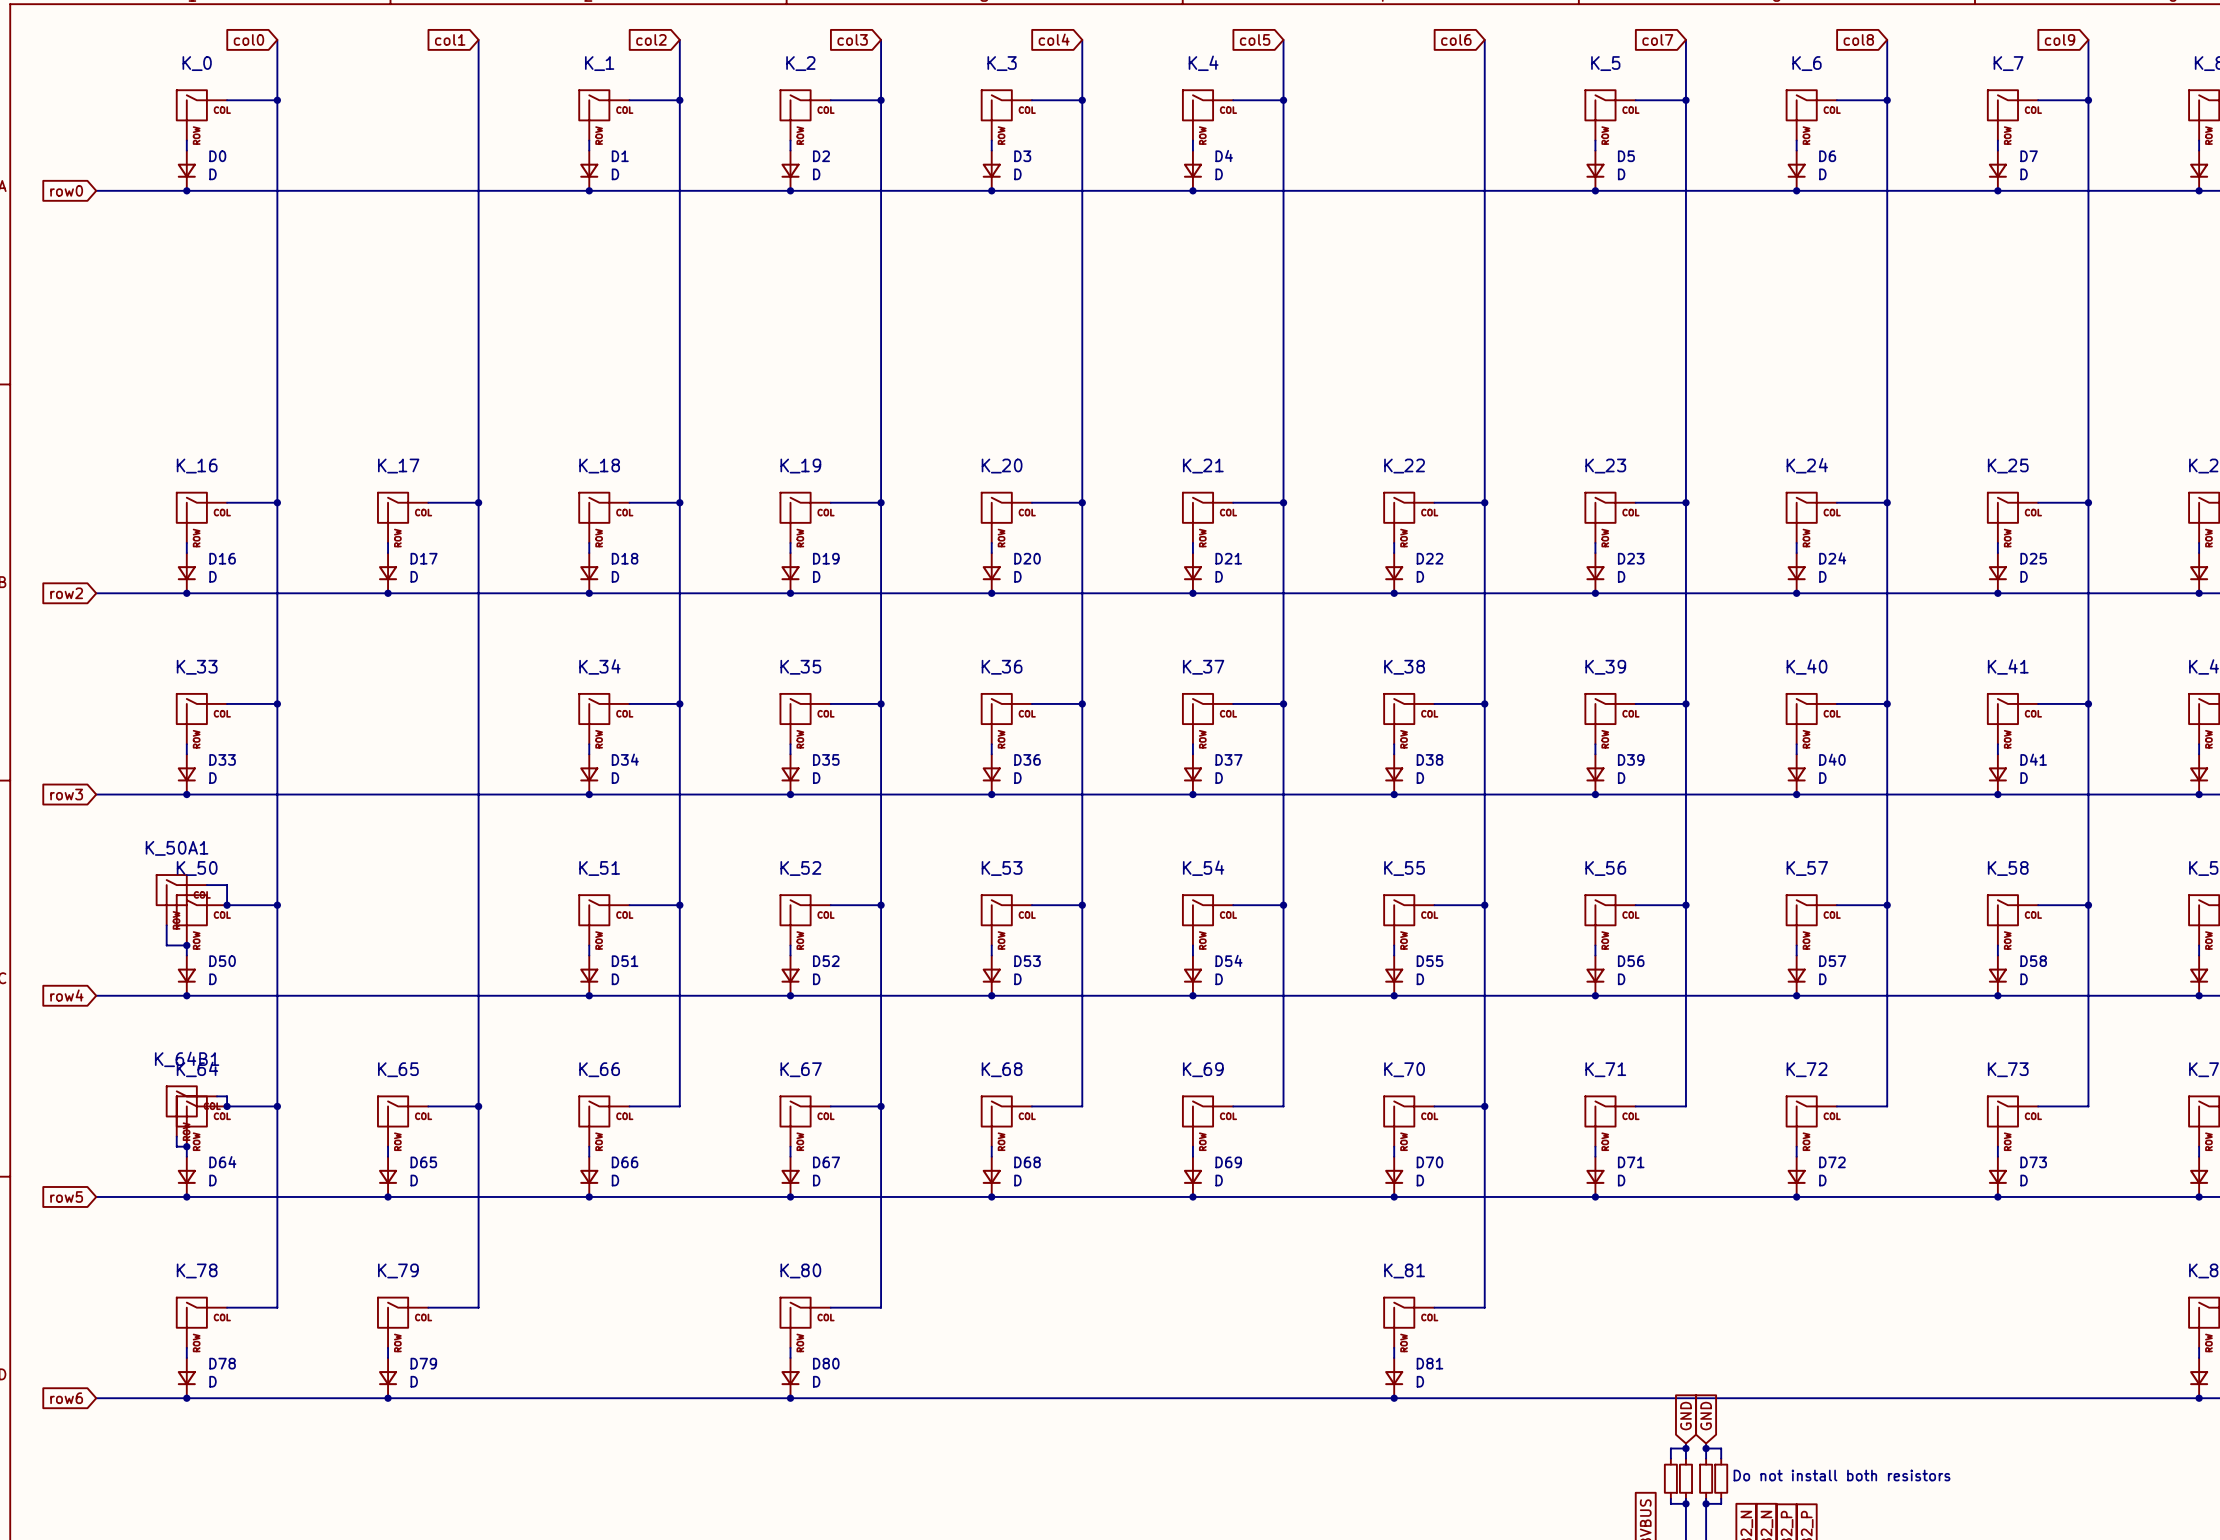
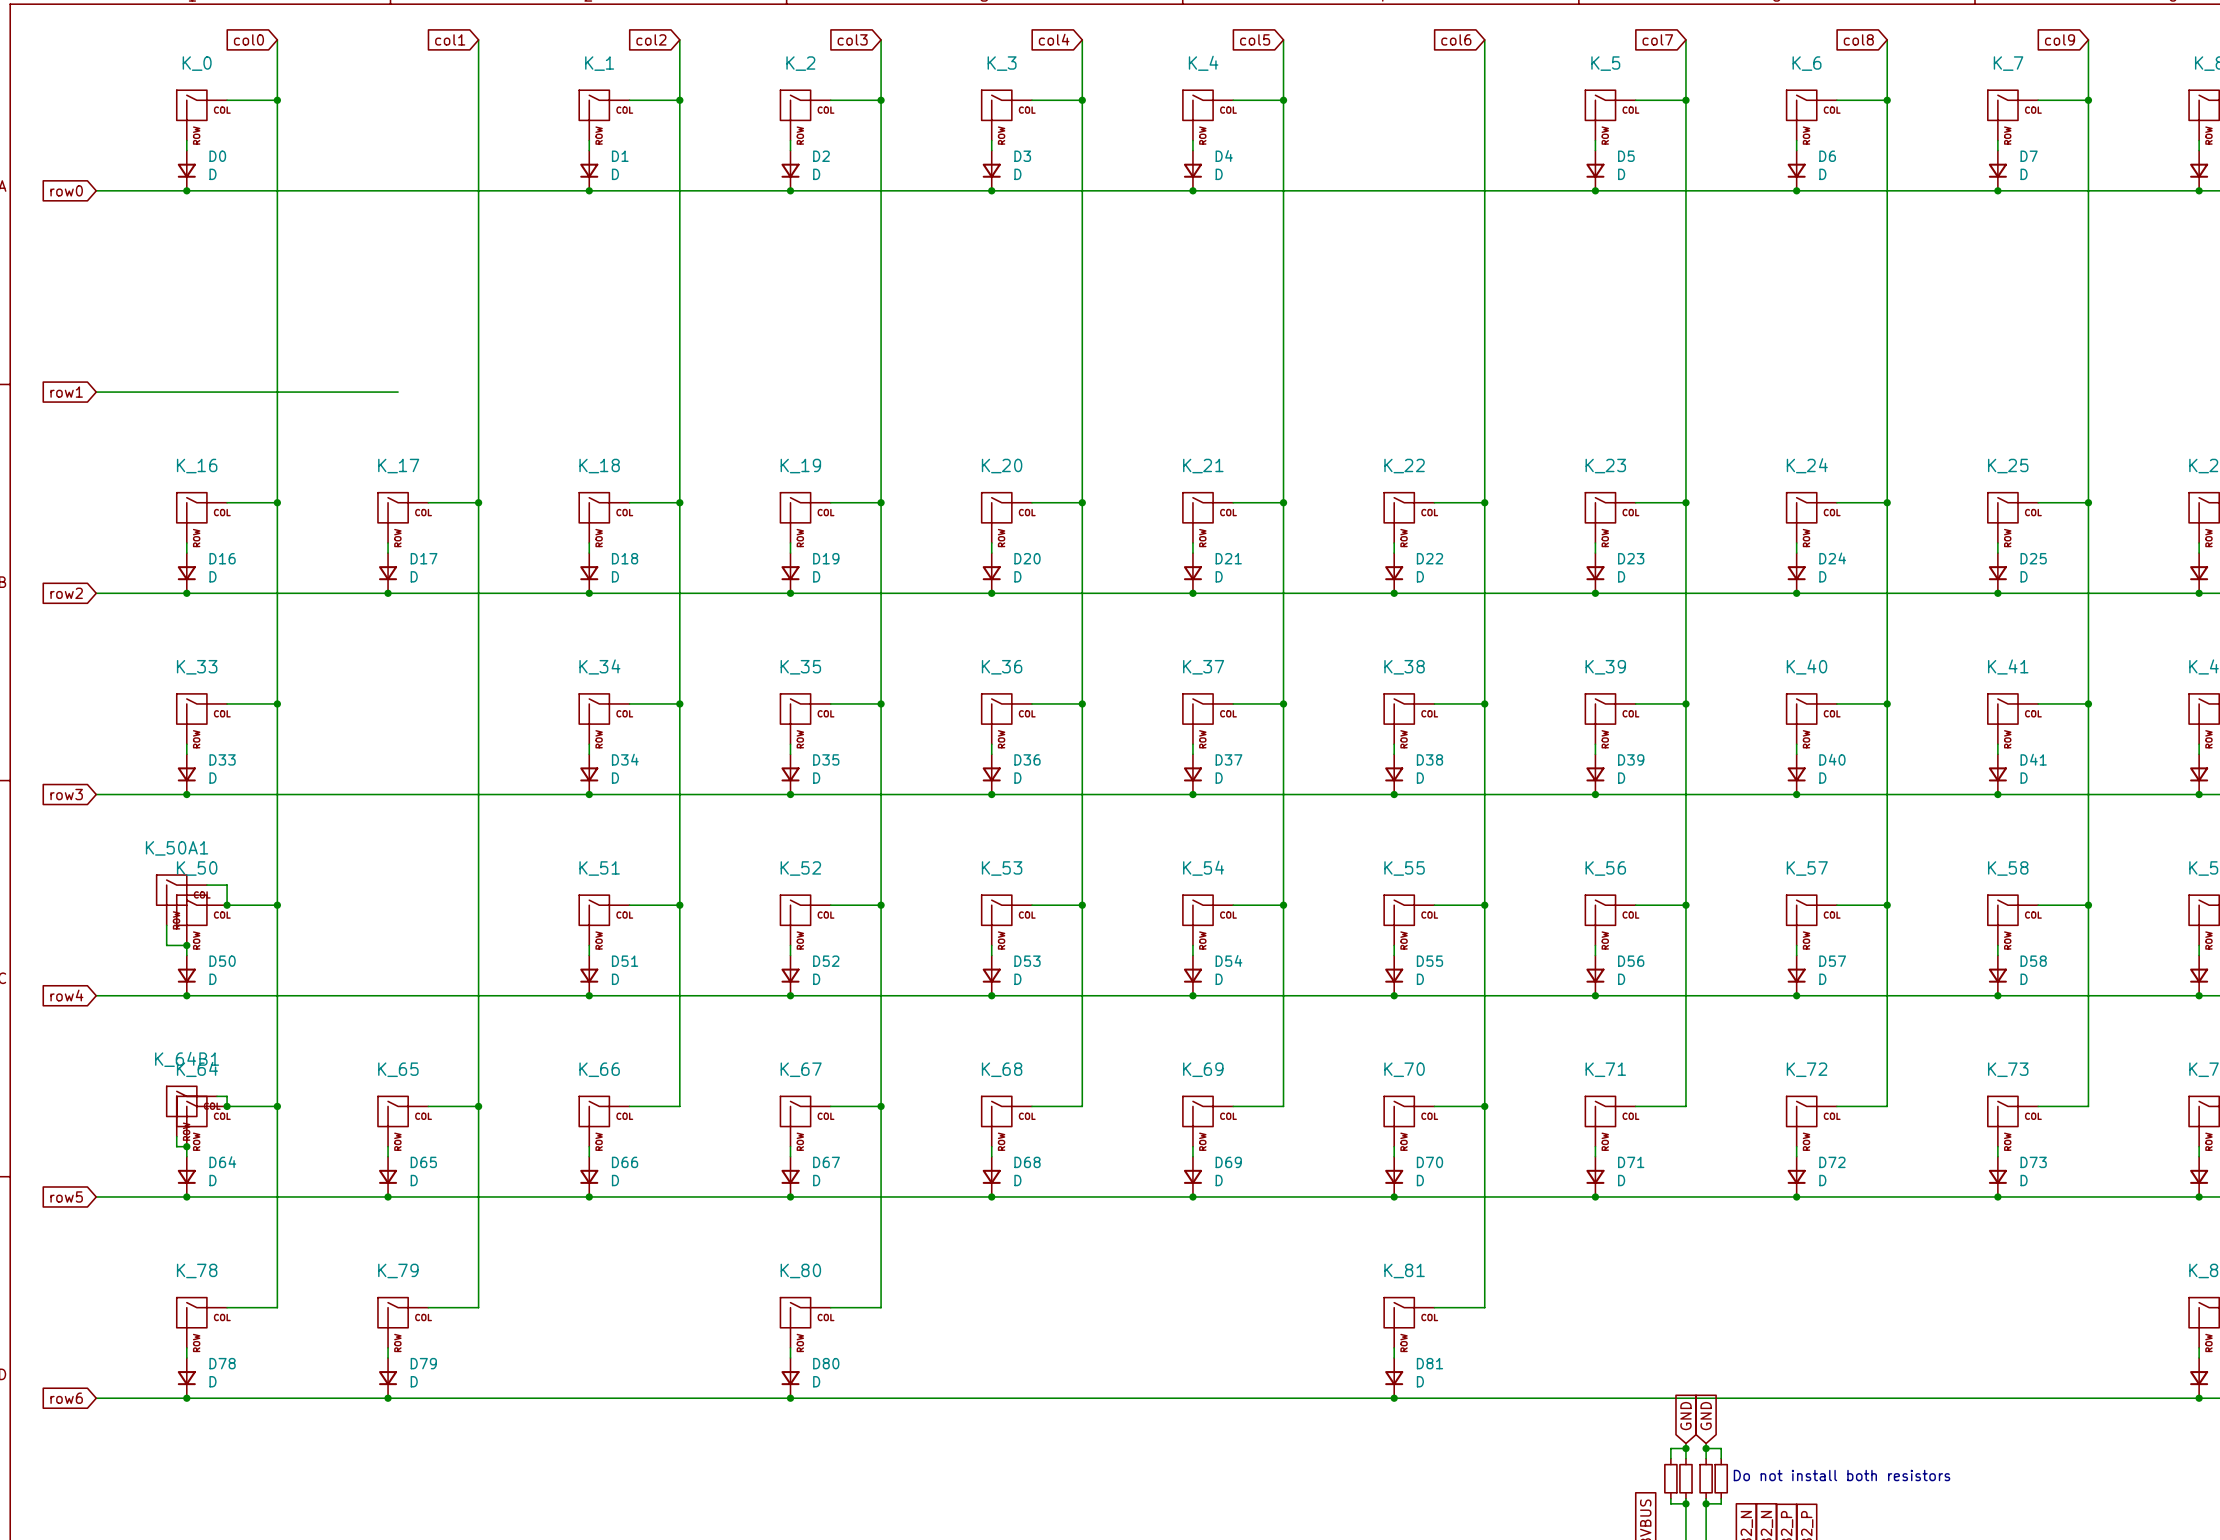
global label: none -> row1 (66, 392)
wire: none -> (96, 392) (398, 392)

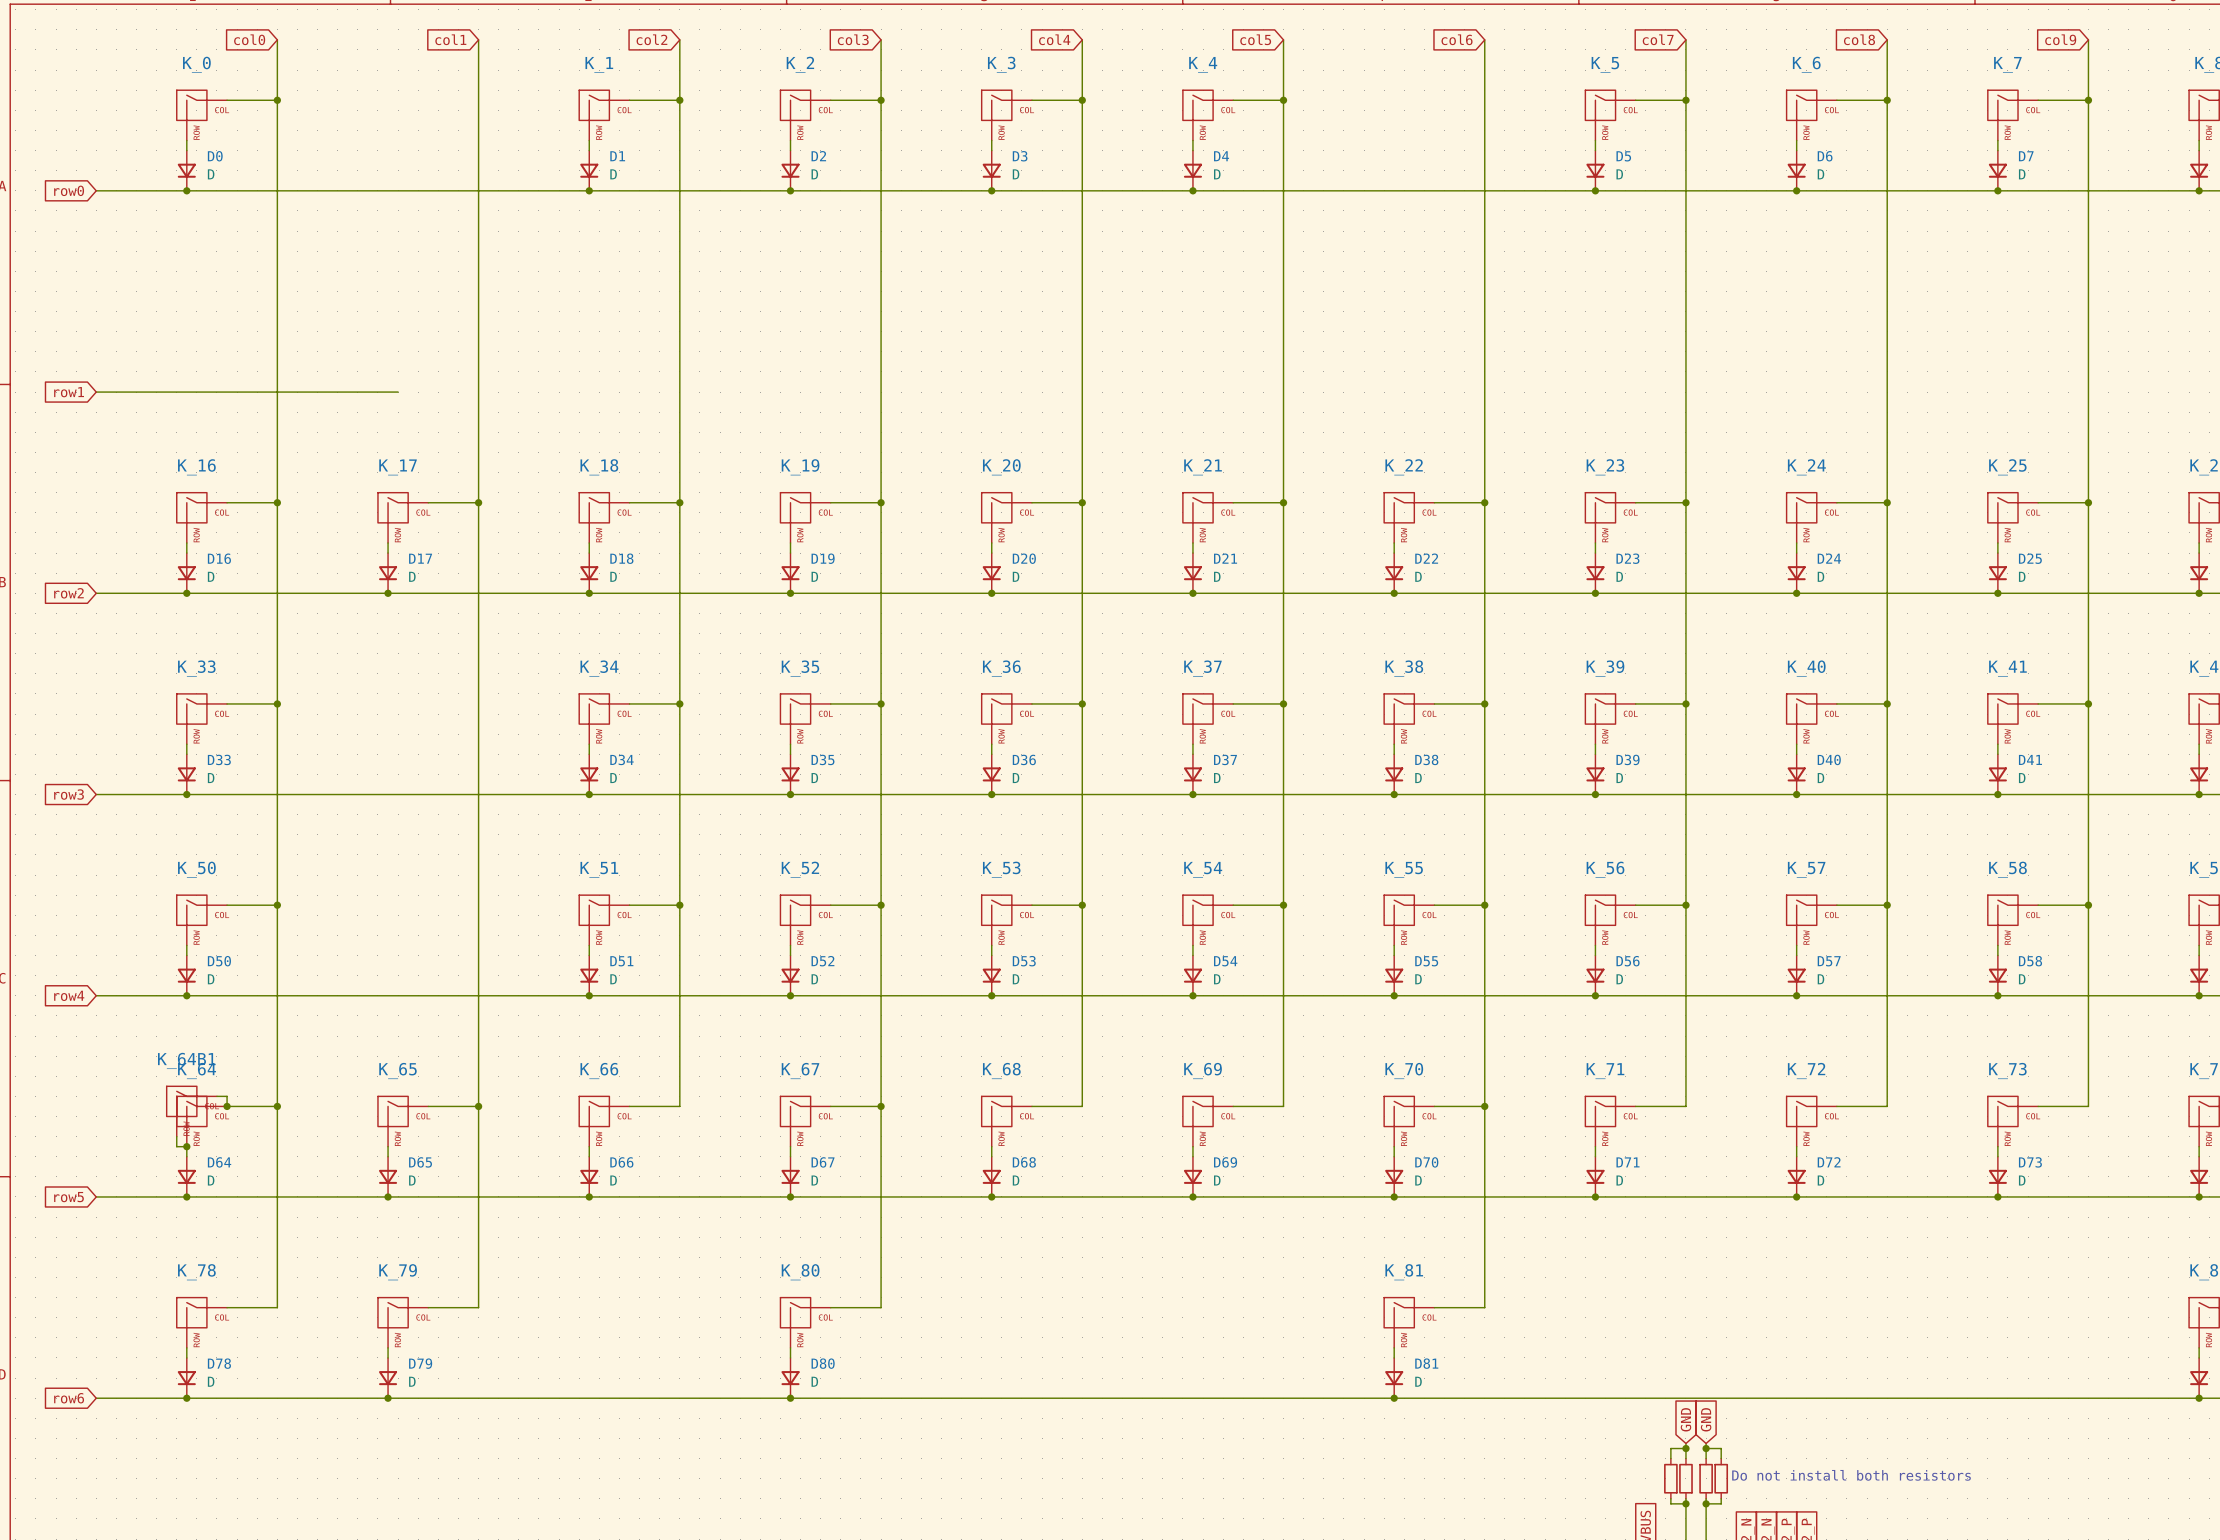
wire: (206, 885) (227, 885) (227, 905) -> none
K_50A1: (181, 900) -> none
junction: (227, 905) -> none
wire: (166, 925) (166, 945) (186, 945) -> none
junction: (186, 945) -> none

